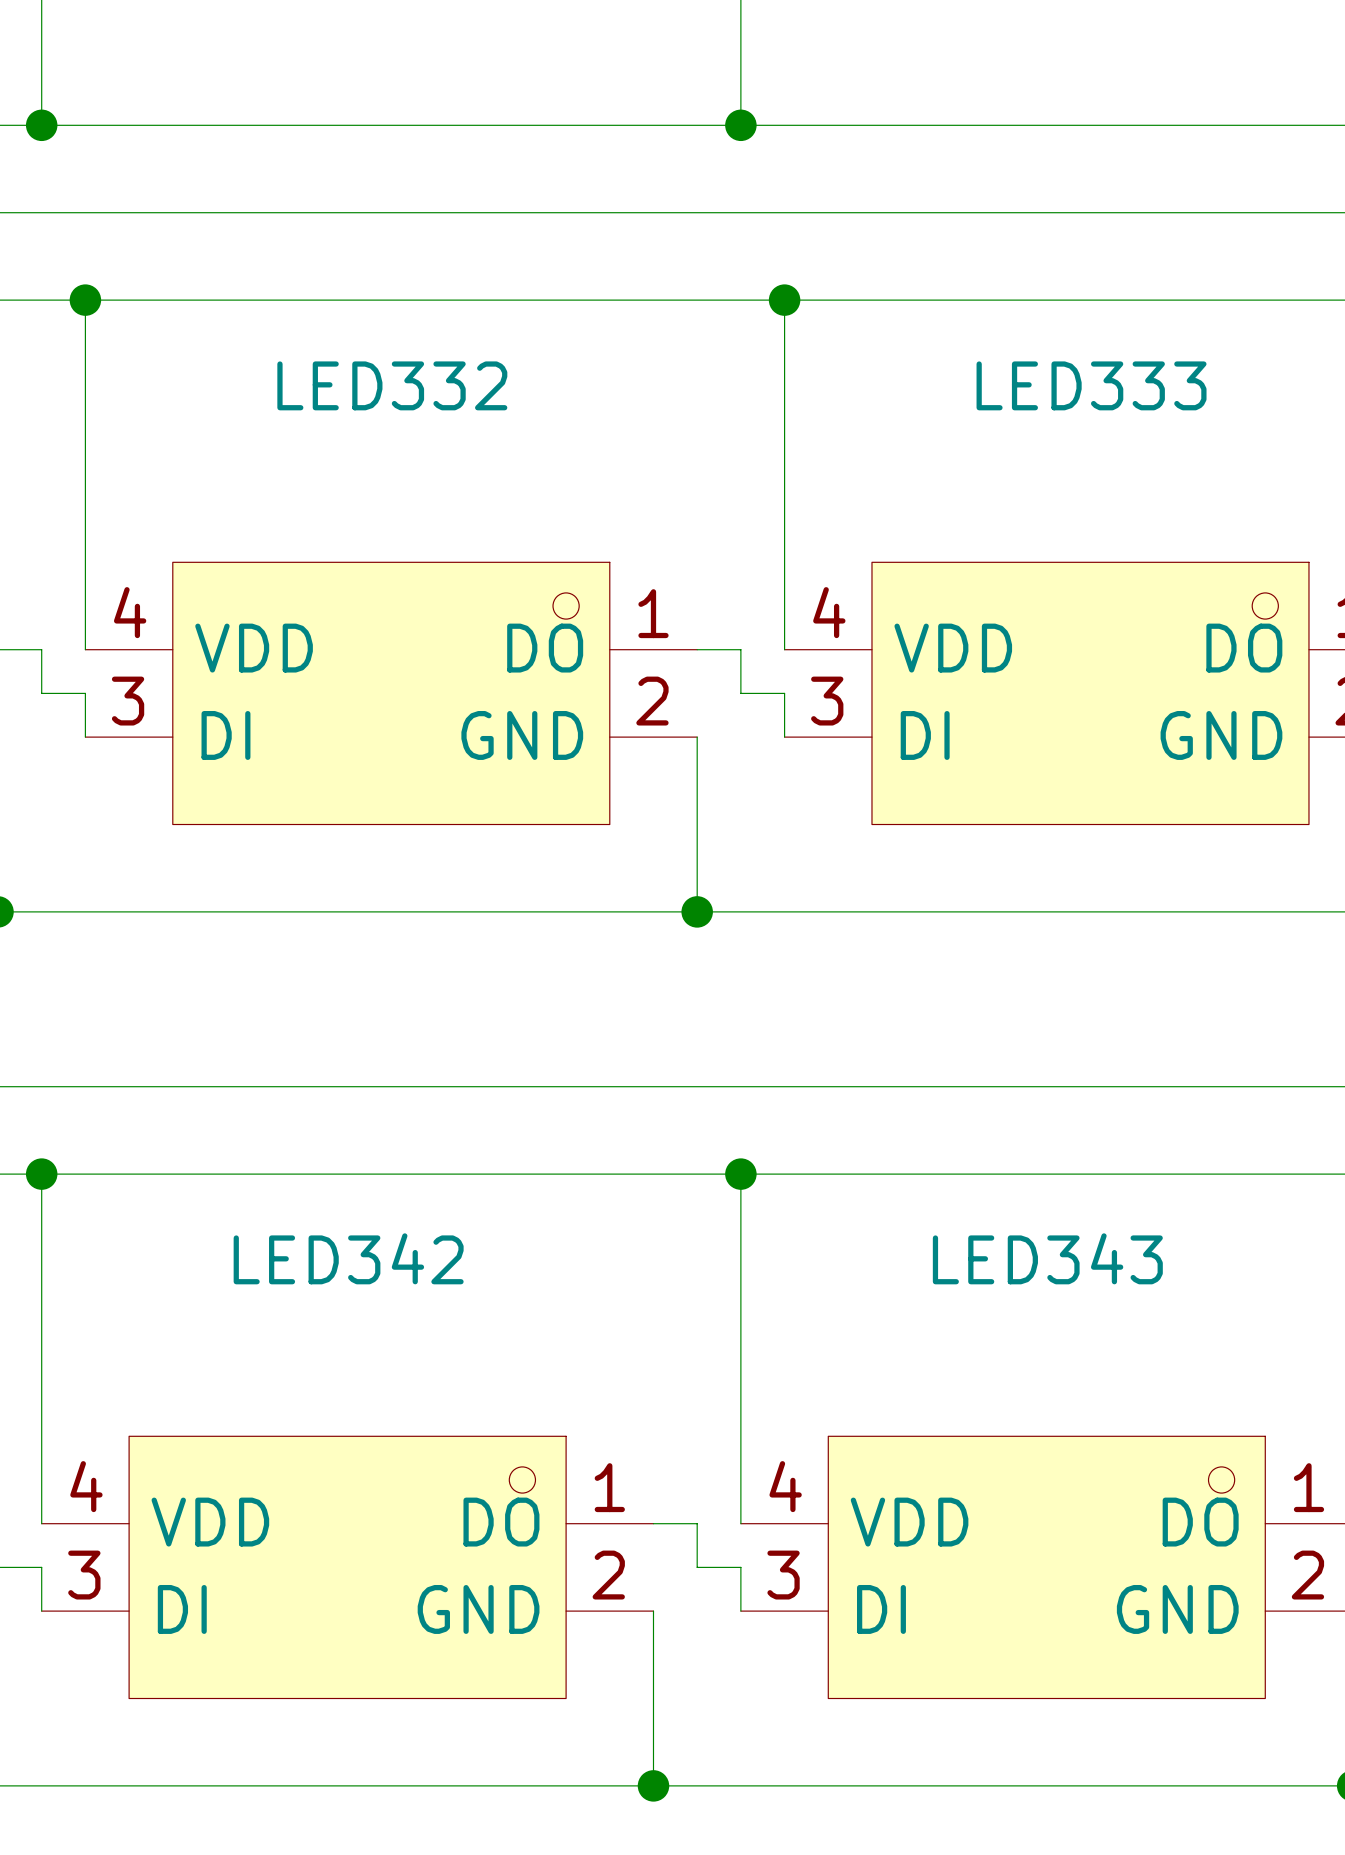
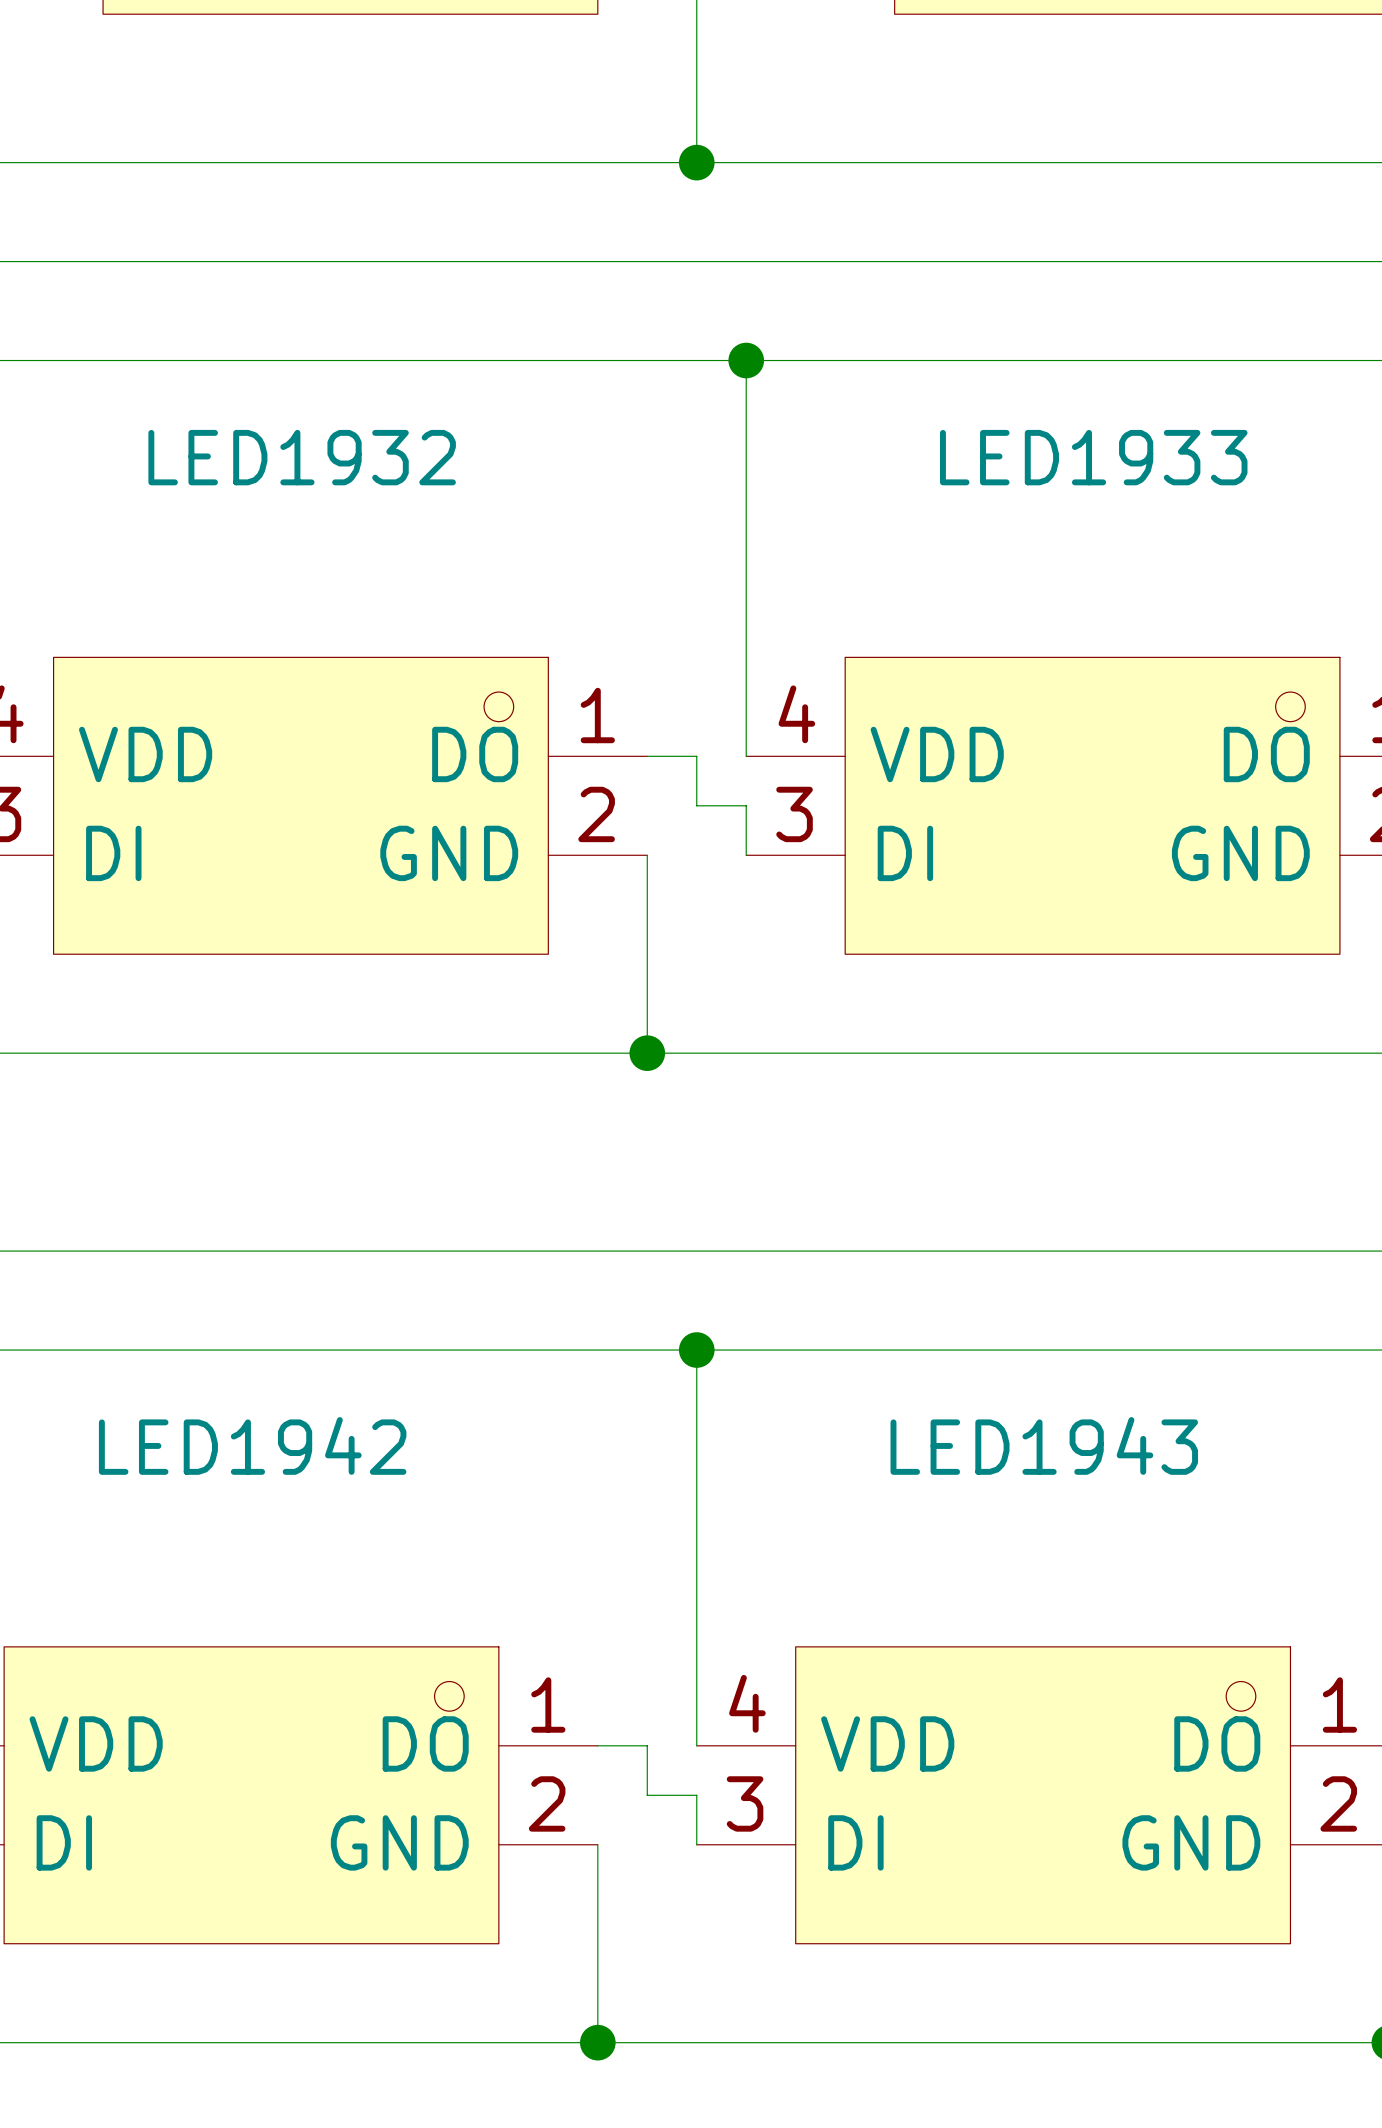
LED332 name: LED332 (392, 385) -> LED1932 (302, 457)
LED333 name: LED333 (1091, 385) -> LED1933 (1093, 457)
LED342 name: LED342 (348, 1258) -> LED1942 (252, 1445)
LED343 name: LED343 (1047, 1258) -> LED1943 (1044, 1445)

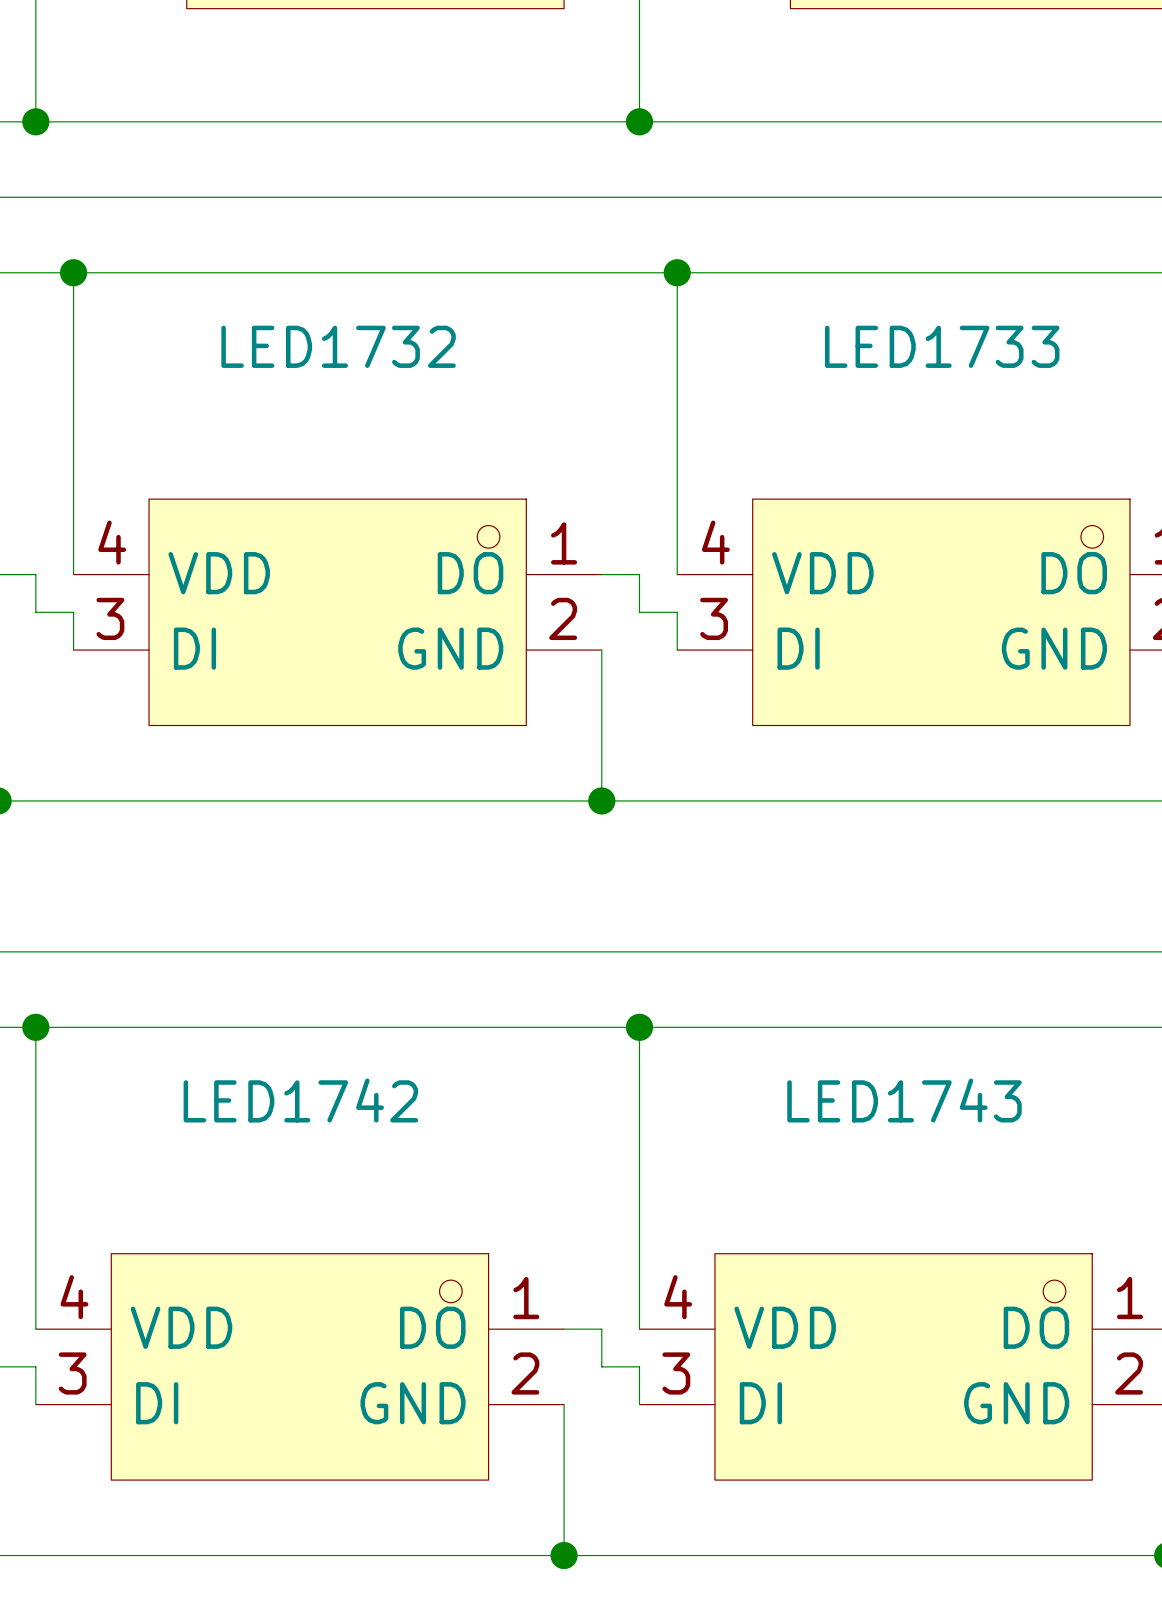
LED1932 name: LED1932 (302, 457) -> LED1732 (338, 346)
LED1933 name: LED1933 (1093, 457) -> LED1733 (942, 346)
LED1942 name: LED1942 (252, 1445) -> LED1742 (300, 1100)
LED1943 name: LED1943 (1044, 1445) -> LED1743 (904, 1100)

